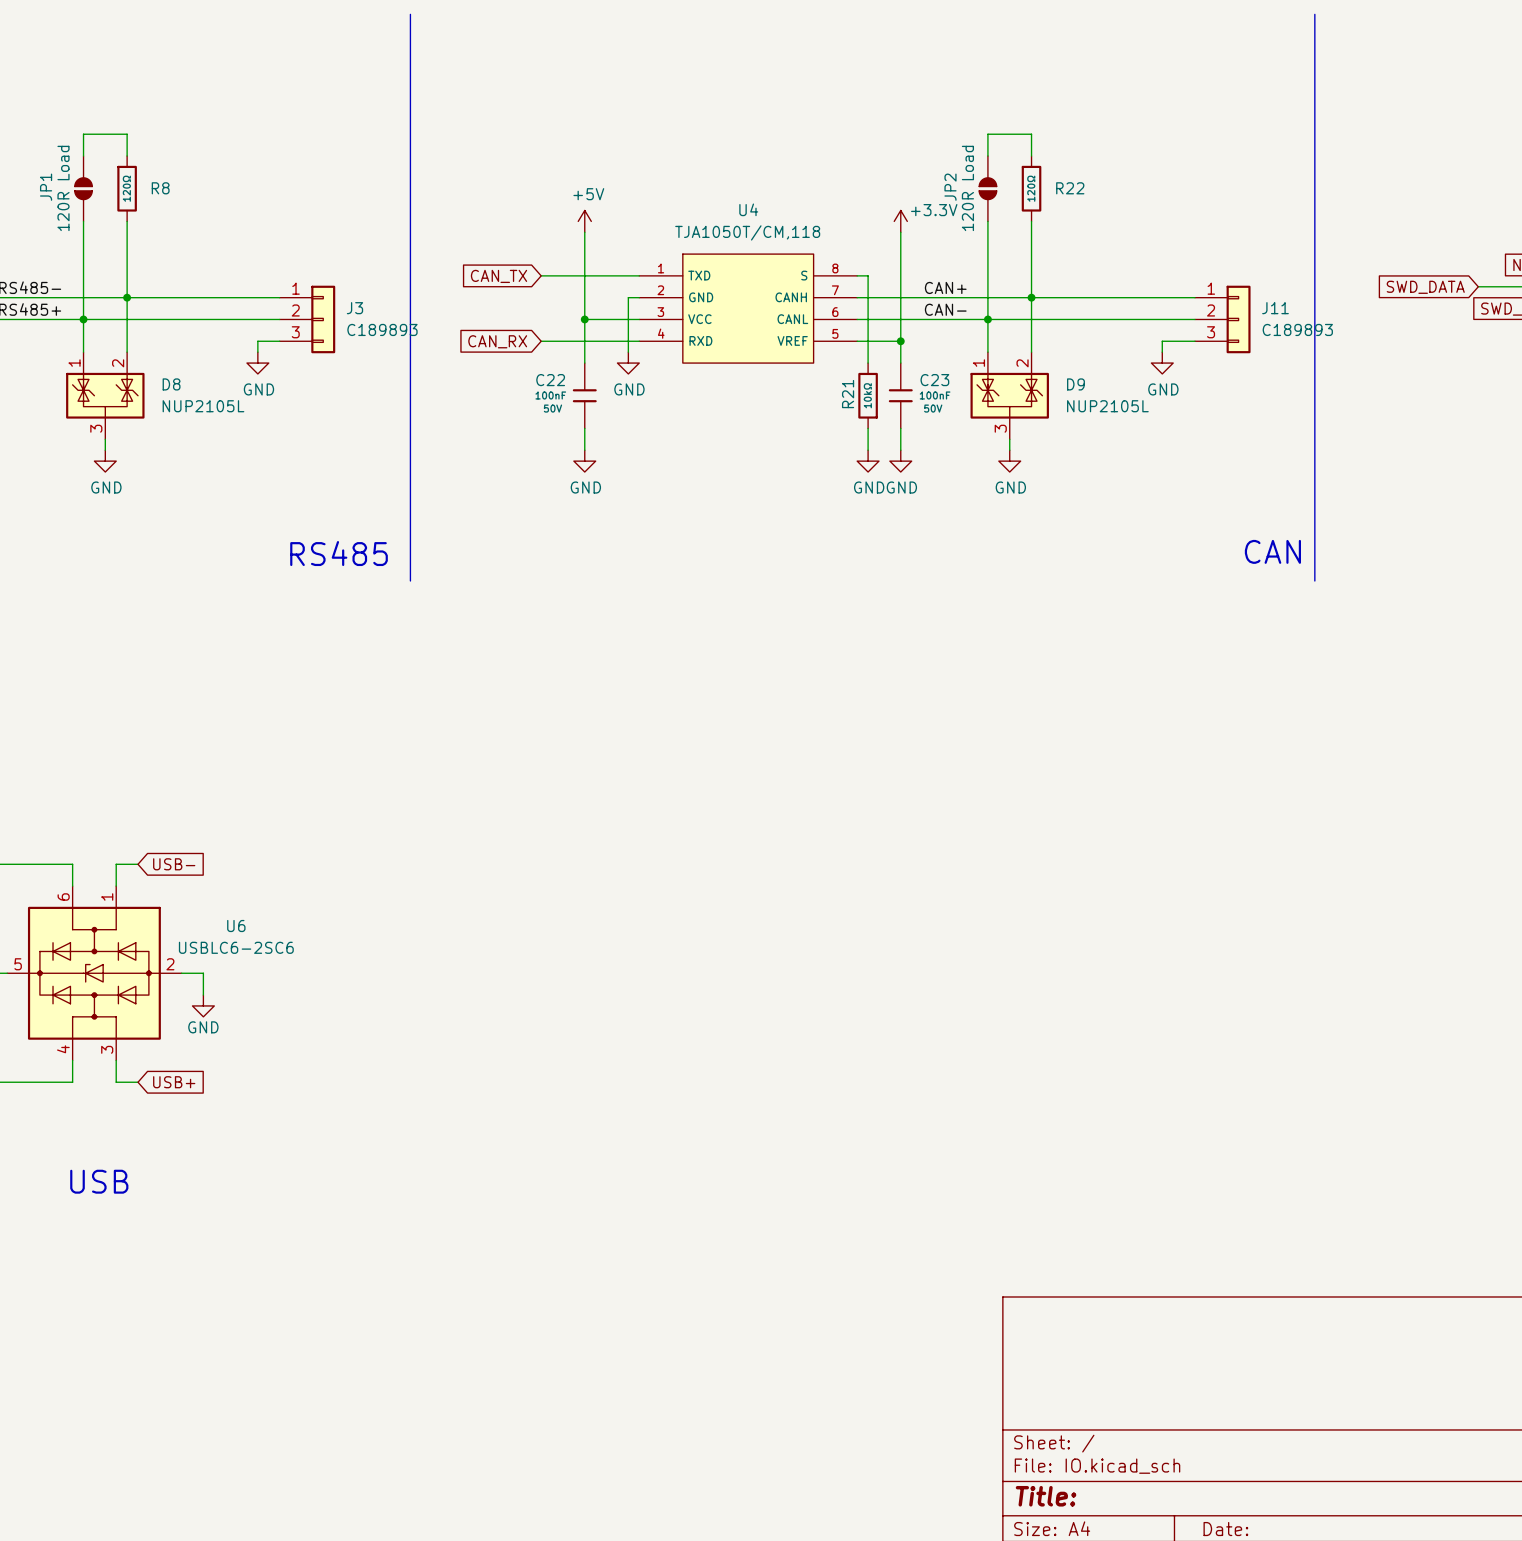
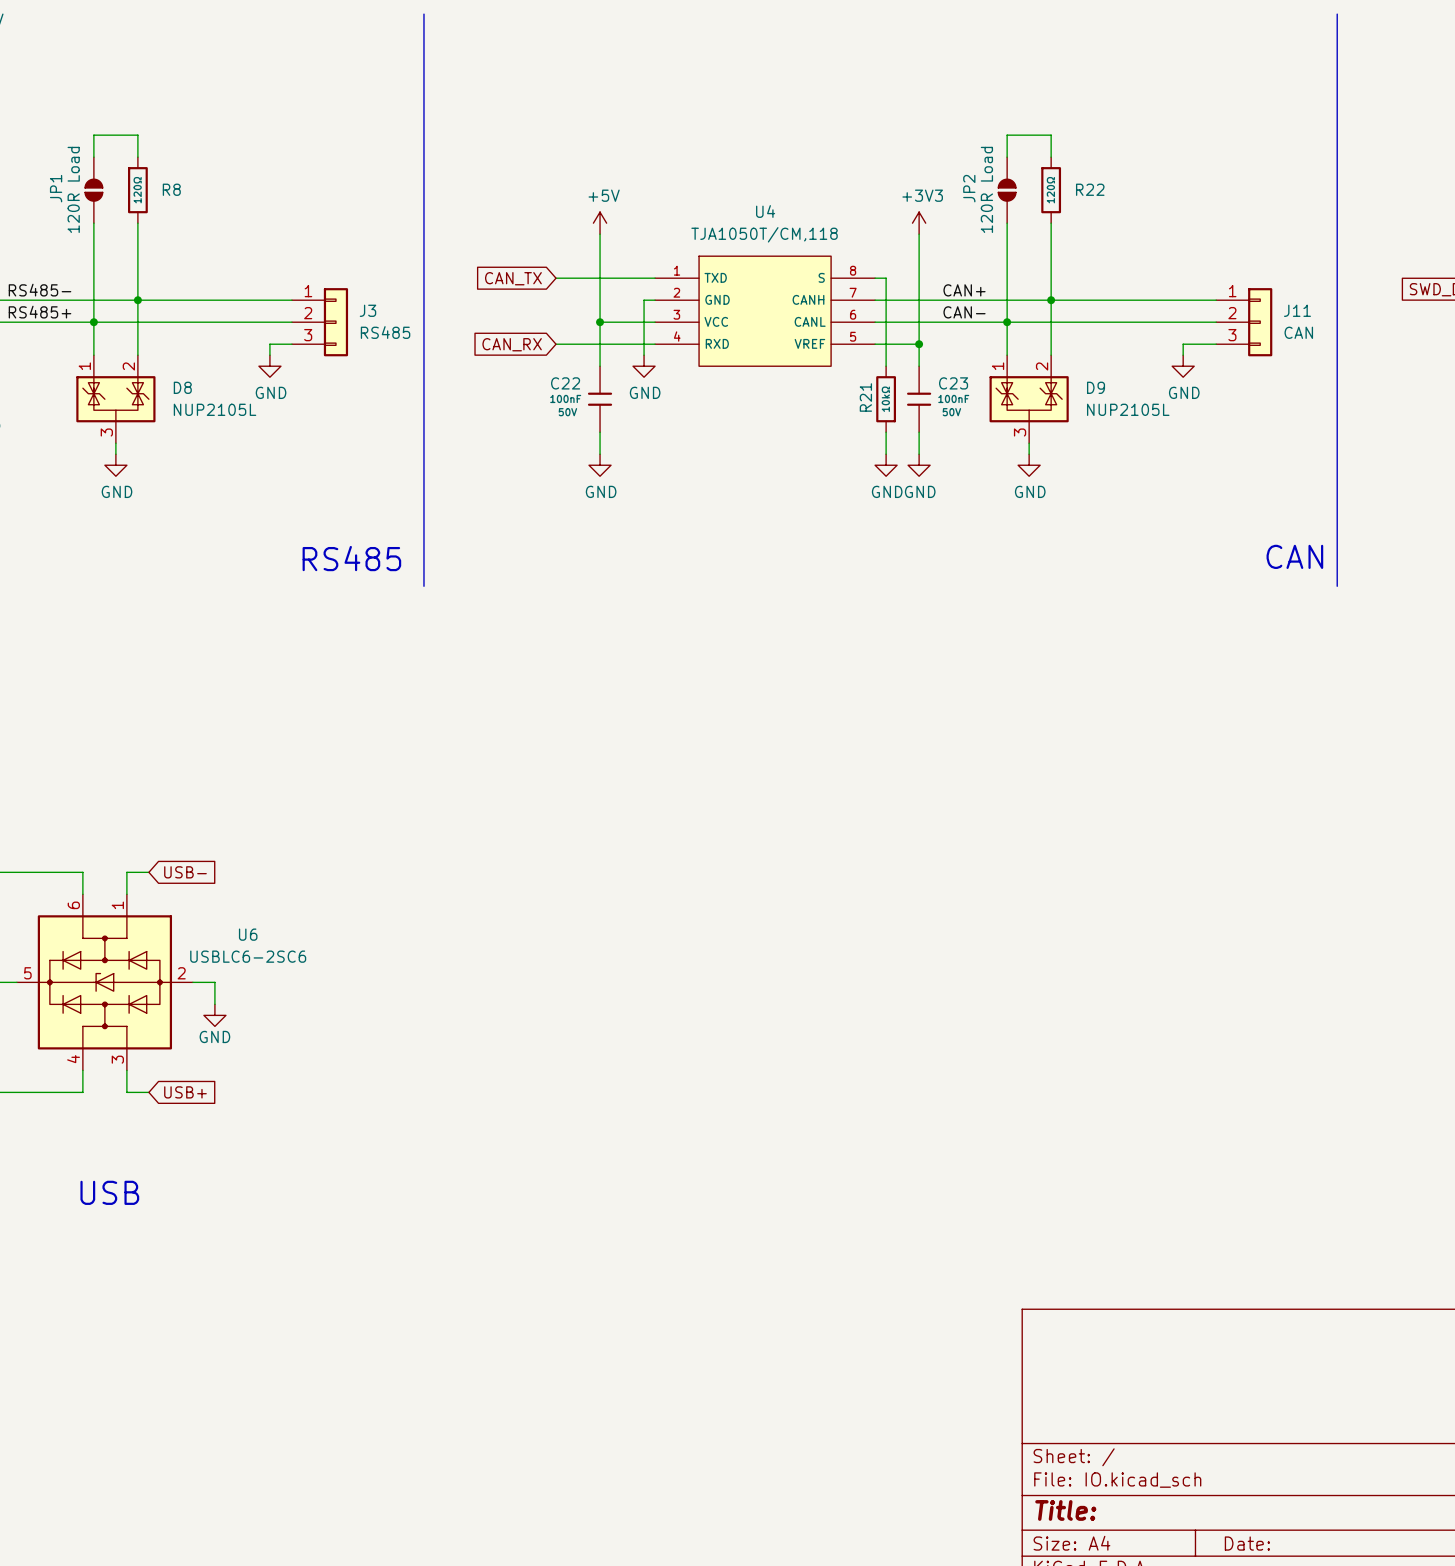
power symbol: +3.3V (900, 221) -> +3V3 (919, 223)
J3 value: C189893 (382, 329) -> RS485 (385, 332)
J11 value: C189893 (1297, 329) -> CAN (1298, 332)

